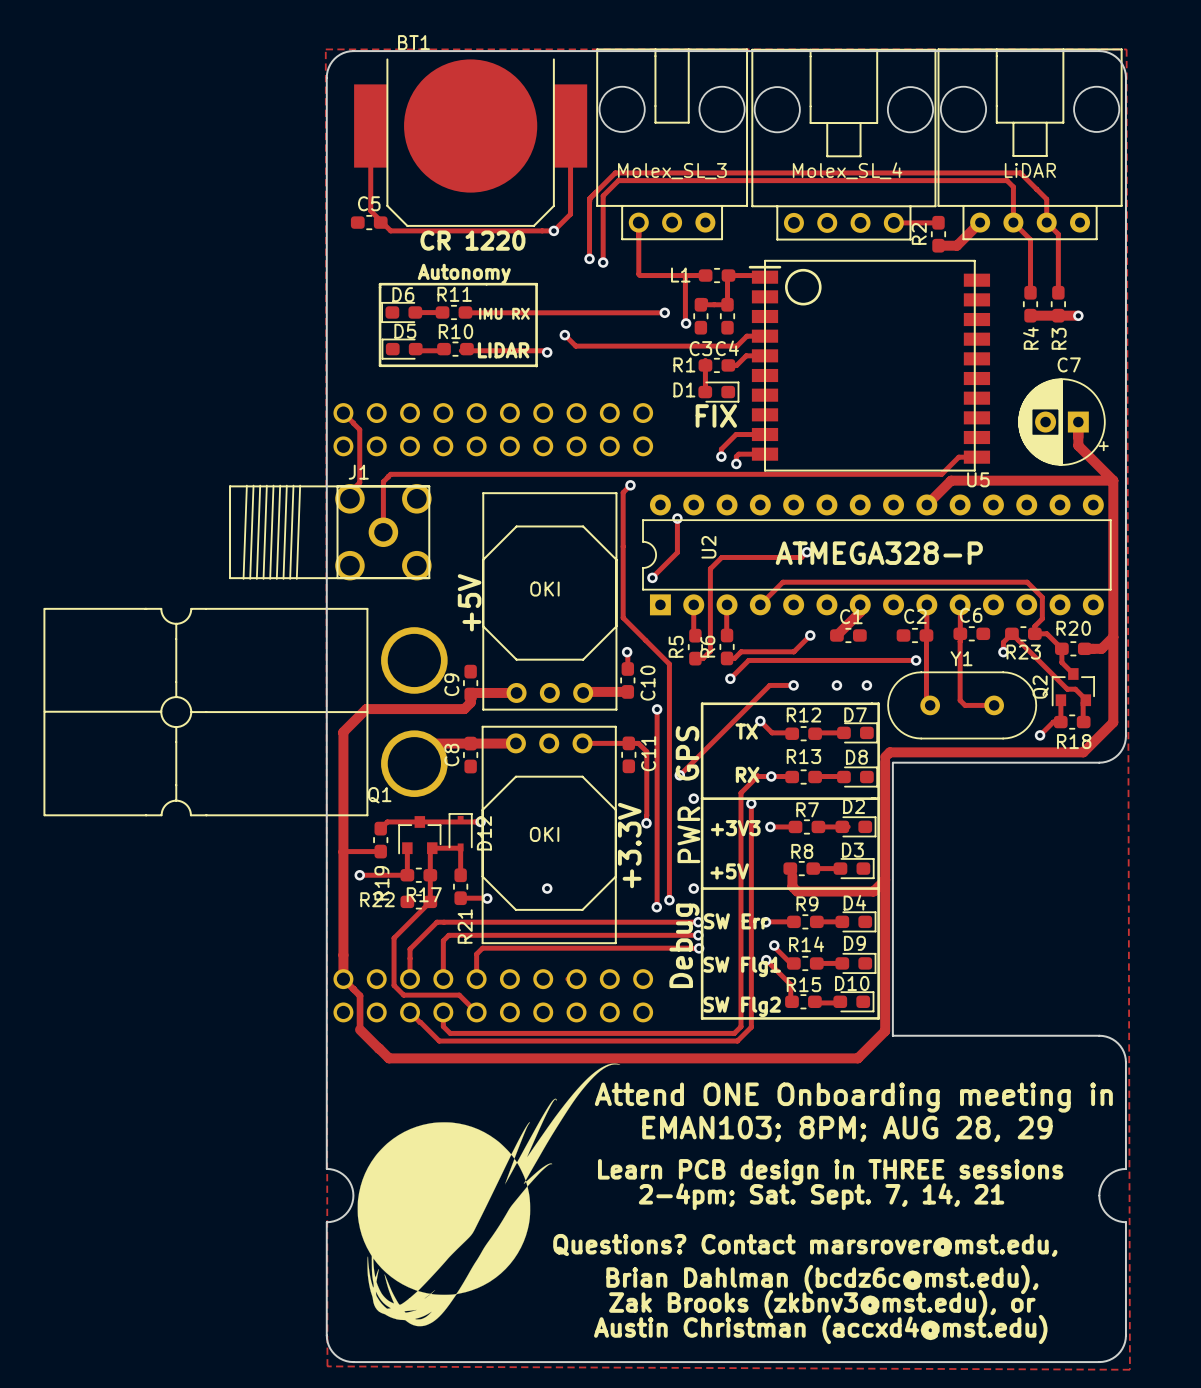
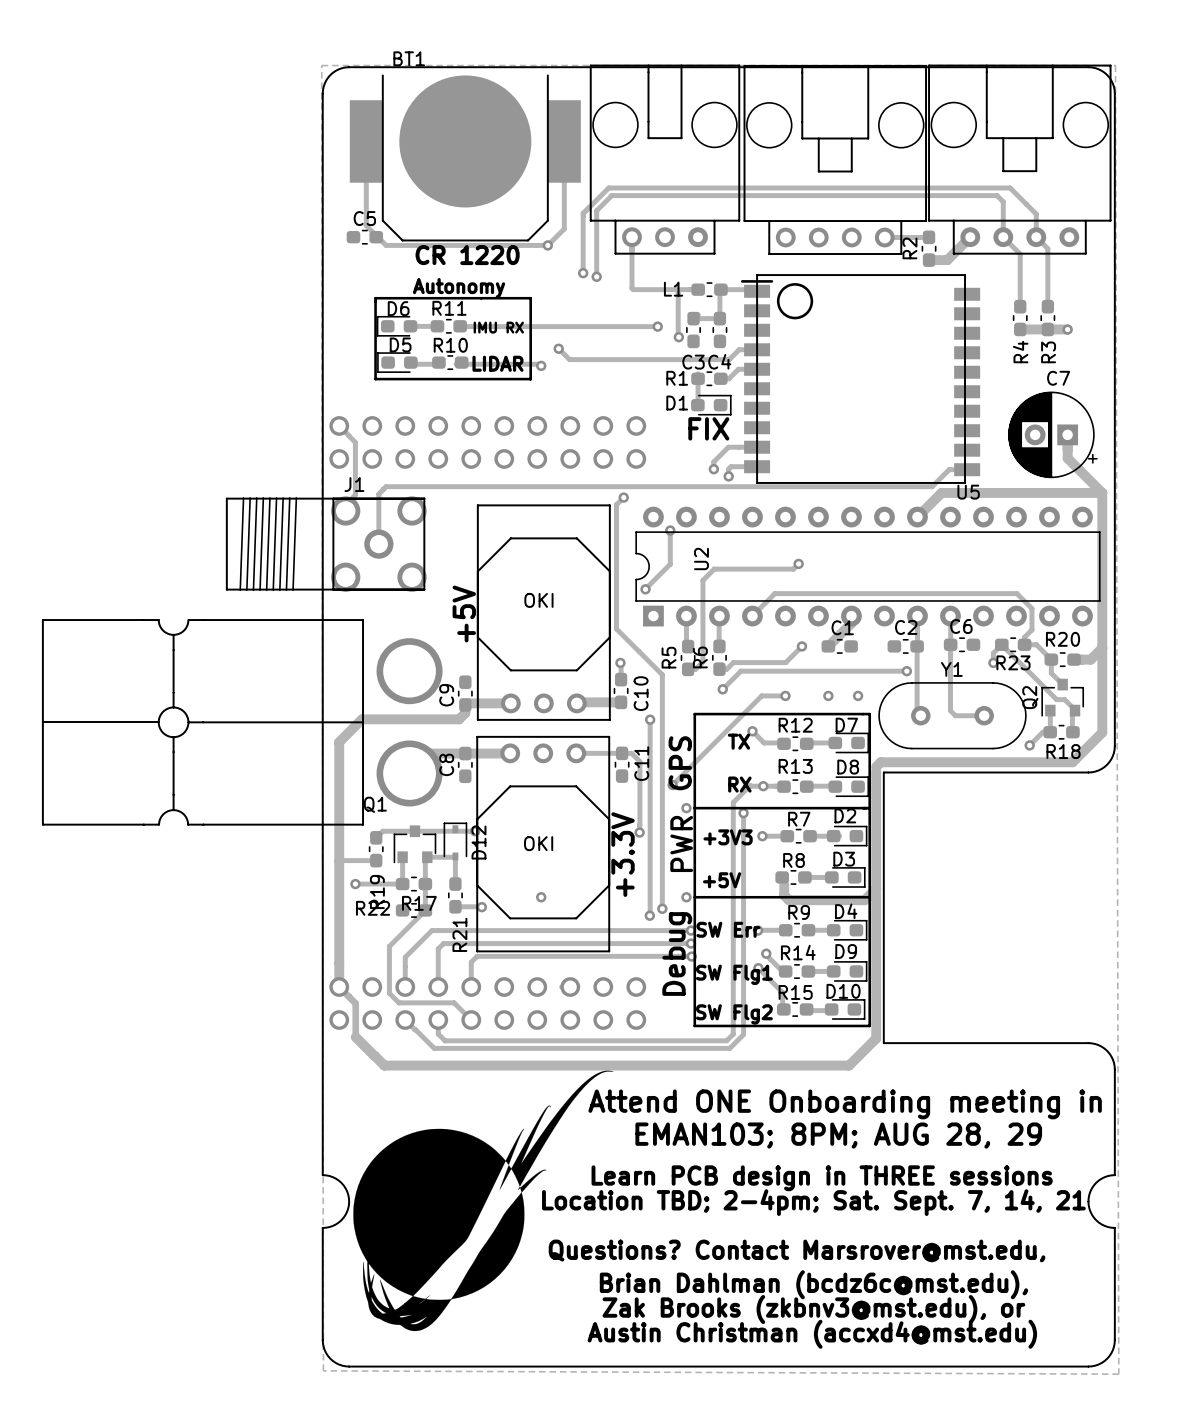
text: Molex_SL_4 (847, 170) -> none
text: LiDAR (1030, 170) -> none
text: Molex_SL_3 (672, 171) -> none
text: ATMEGA328-P (879, 553) -> none
text: 2-4pm; Sat. Sept. 7, 14, 21 (821, 1196) -> Location TBD; 2-4pm; Sat. Sept. 7, 14, 21 (813, 1202)
text: Questions? Contact marsrover@mst.edu, (805, 1245) -> Questions? Contact Marsrover@mst.edu, (797, 1250)

